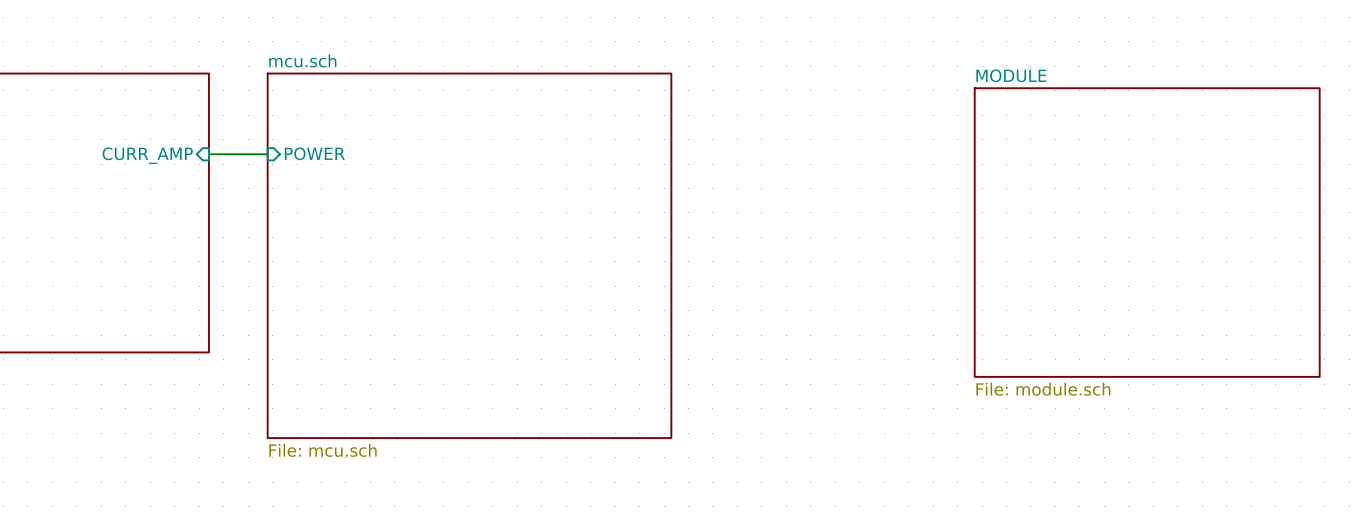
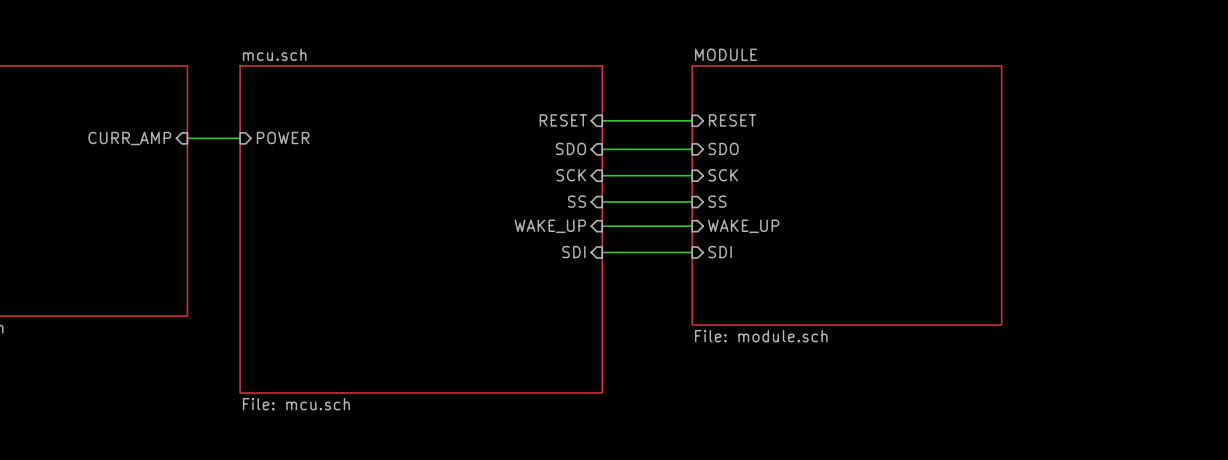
sheet pin: none -> RESET (563, 120)
wire: none -> (602, 120) (692, 120)
sheet pin: none -> RESET (732, 120)
sheet pin: none -> SDO (570, 148)
wire: none -> (602, 149) (692, 149)
sheet pin: none -> SDO (723, 148)
sheet pin: none -> SCK (571, 175)
wire: none -> (602, 175) (692, 175)
sheet pin: none -> SCK (723, 175)
sheet pin: none -> SS (576, 201)
sheet pin: none -> SS (717, 201)
wire: none -> (602, 202) (692, 202)
sheet MODULE position: (1147, 232) -> (846, 195)
wire: none -> (602, 226) (692, 226)
sheet pin: none -> WAKE_UP (550, 226)
sheet pin: none -> WAKE_UP (743, 226)
sheet pin: none -> SDI (573, 252)
wire: none -> (602, 252) (692, 252)
sheet pin: none -> SDI (720, 252)

